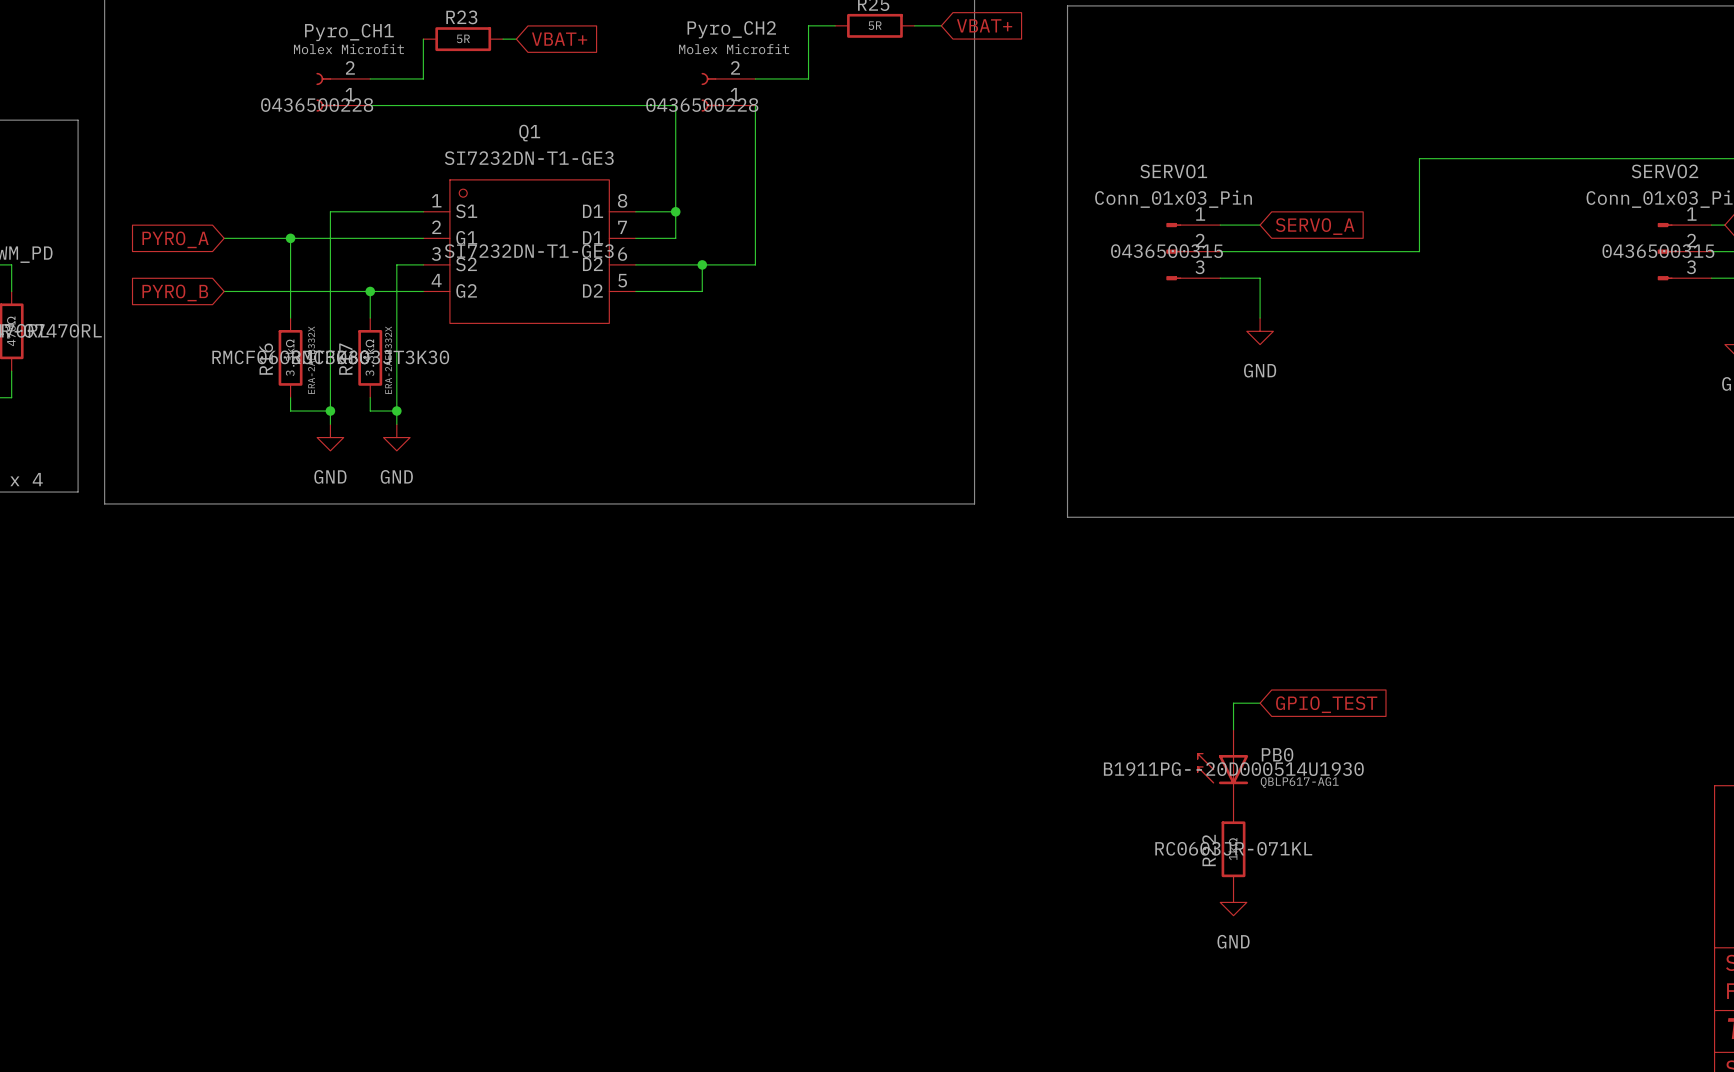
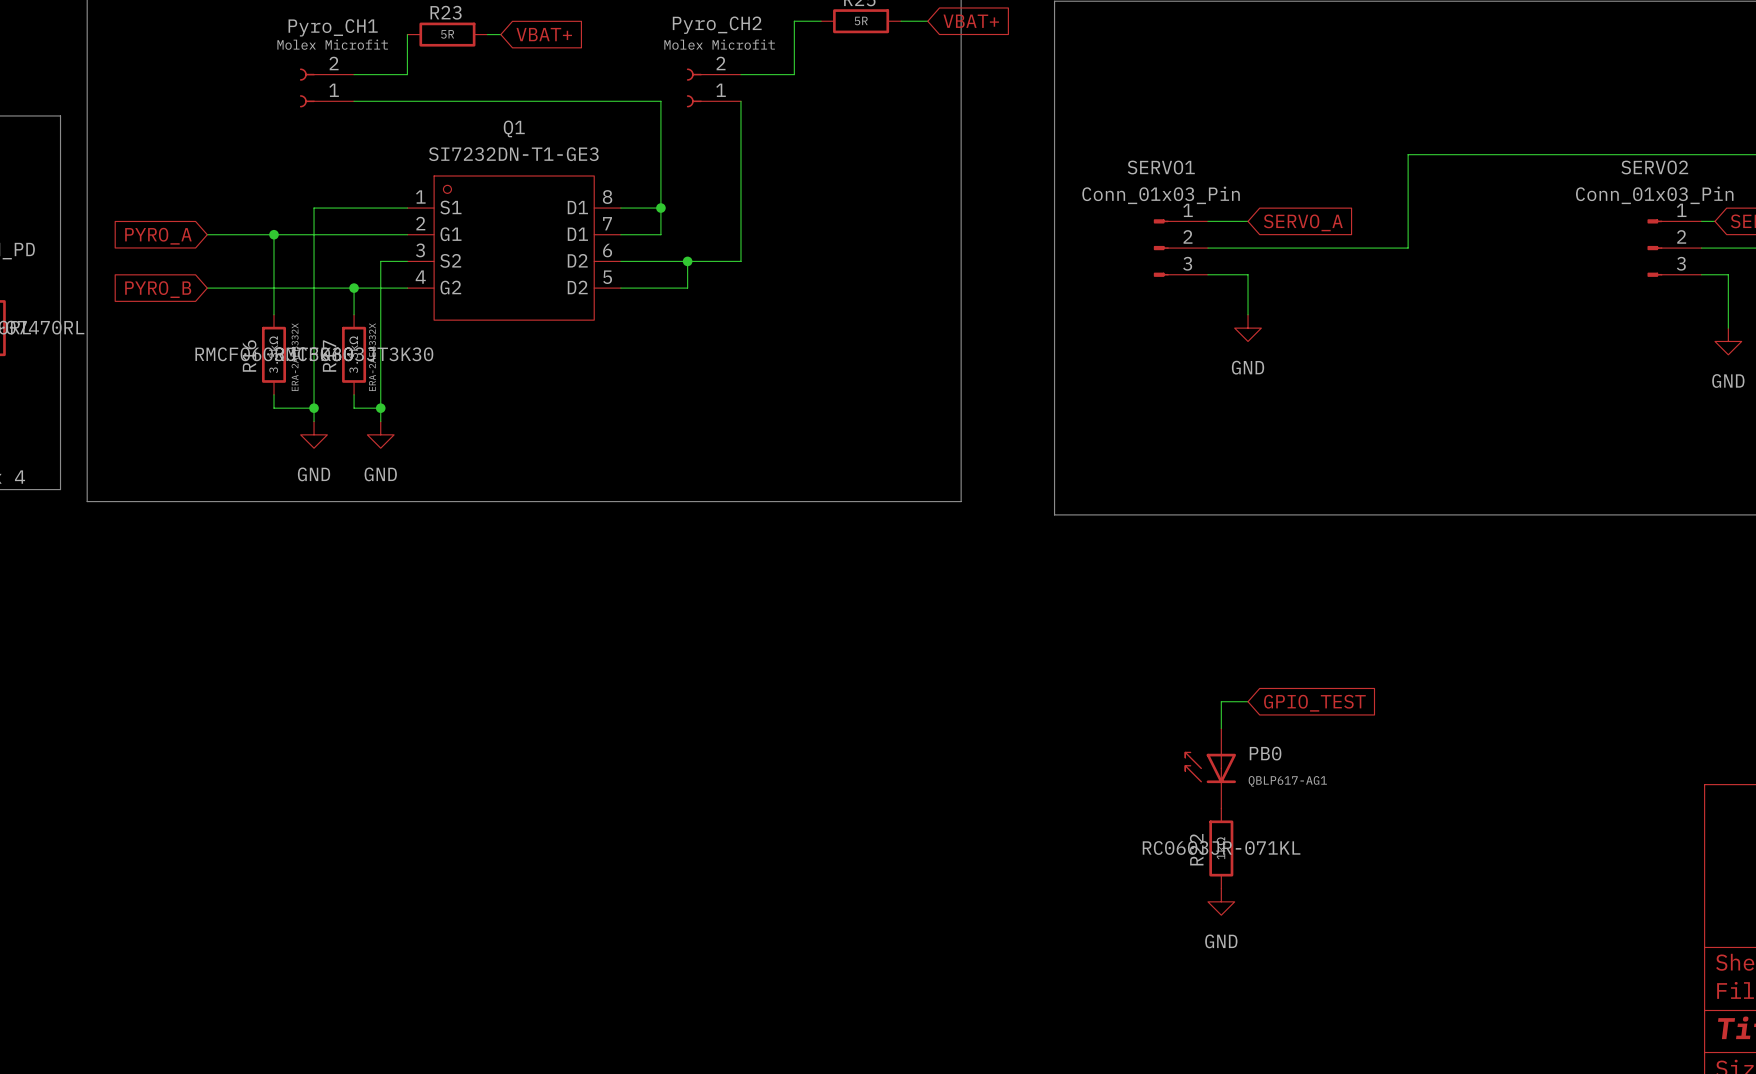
Pyro_CH1 text: 0436500228 (317, 105) -> none
Pyro_CH2 text: 0436500228 (702, 105) -> none
Q1 text: SI7232DN-T1-GE3 (529, 251) -> none
SERVO1 text: 0436500315 (1167, 251) -> none
SERVO2 text: 0436500315 (1658, 251) -> none
PB0 text: B1911PG--20D000514U1930 (1233, 769) -> none

